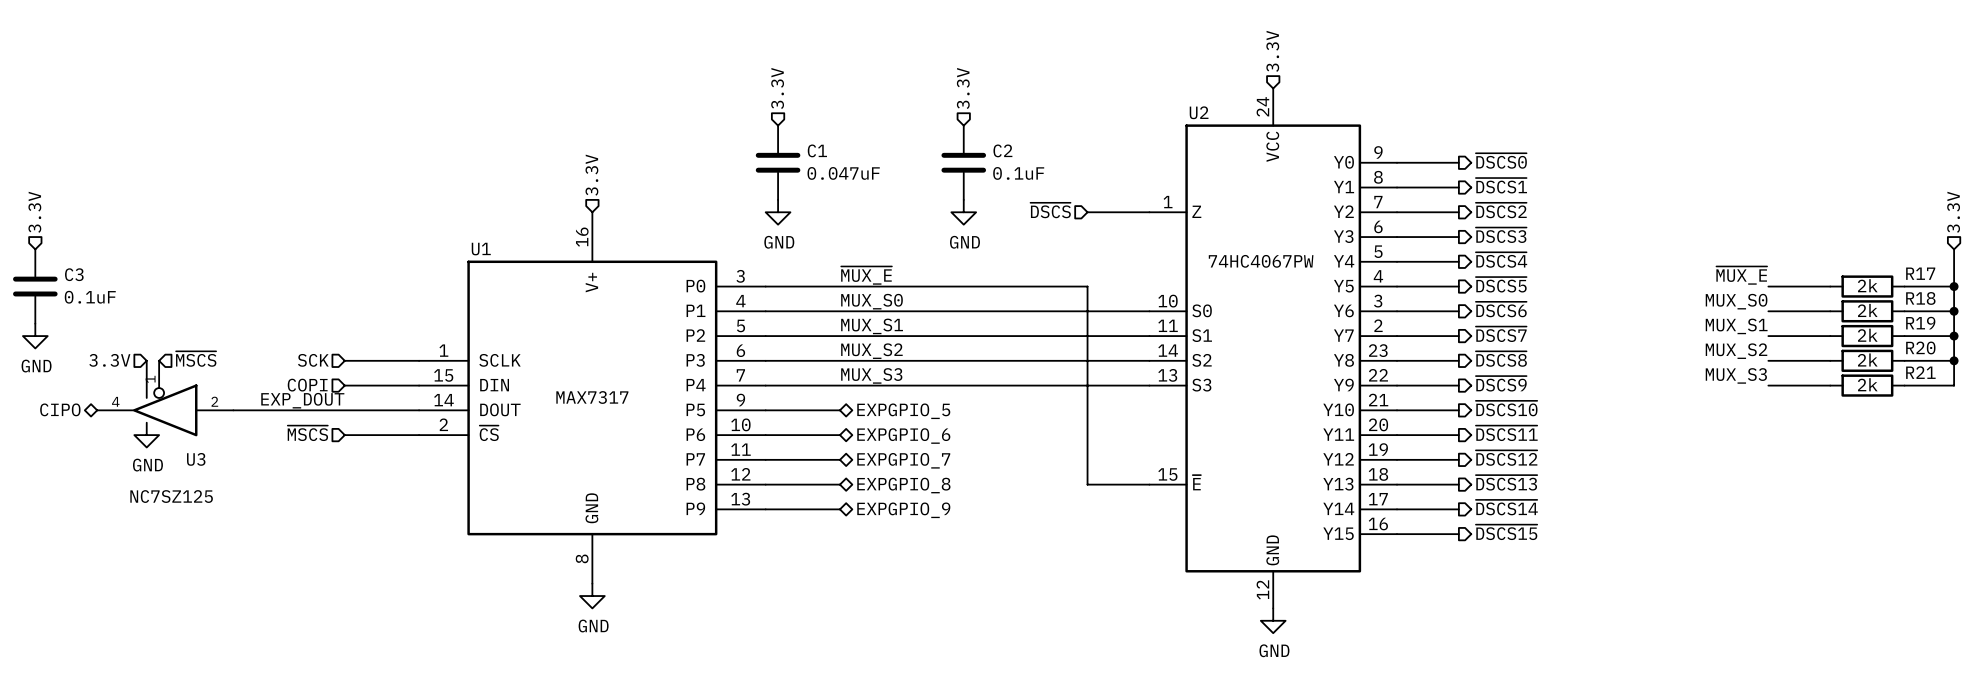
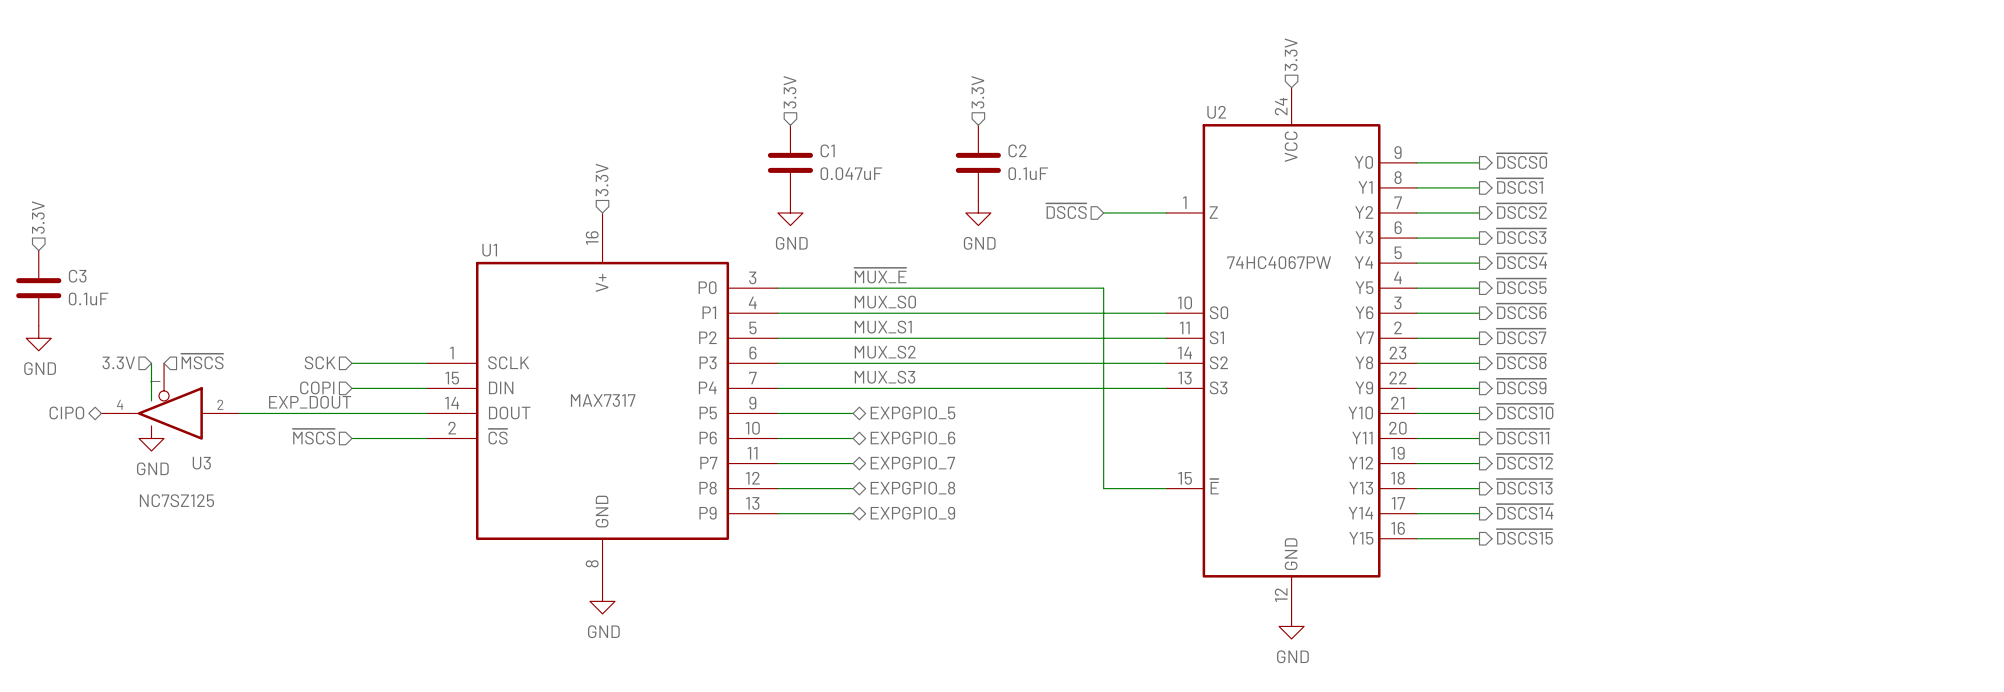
hierarchical label: 3.3V (1953, 212) -> none
wire: (1954, 249) (1954, 385) (1904, 385) -> none
label: ~{MUX_E} (1741, 275) -> none
wire: (1768, 286) (1830, 286) -> none
R17: 2k (1867, 286) -> none
wire: (1904, 286) (1954, 286) -> none
junction: (1954, 286) -> none
label: MUX_S0 (1736, 301) -> none
wire: (1768, 311) (1830, 311) -> none
R18: 2k (1867, 311) -> none
wire: (1904, 311) (1954, 311) -> none
junction: (1954, 311) -> none
label: MUX_S1 (1736, 326) -> none
wire: (1768, 336) (1830, 336) -> none
R19: 2k (1867, 336) -> none
wire: (1904, 336) (1954, 336) -> none
junction: (1954, 336) -> none
label: MUX_S2 (1736, 351) -> none
wire: (1768, 360) (1830, 360) -> none
R20: 2k (1867, 360) -> none
wire: (1904, 360) (1954, 360) -> none
junction: (1954, 360) -> none
label: MUX_S3 (1736, 375) -> none
wire: (1768, 385) (1830, 385) -> none
R21: 2k (1867, 385) -> none

